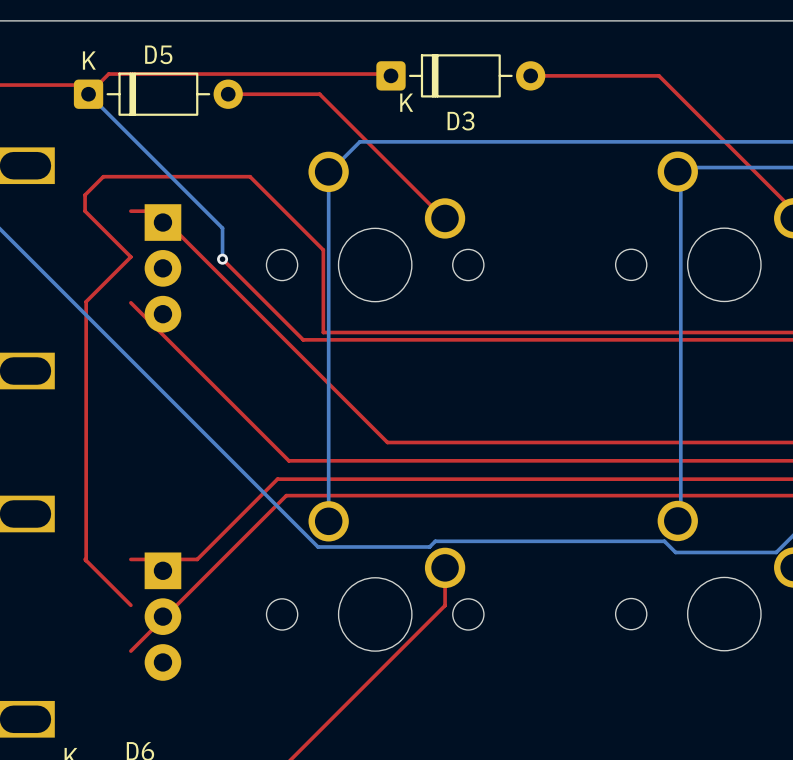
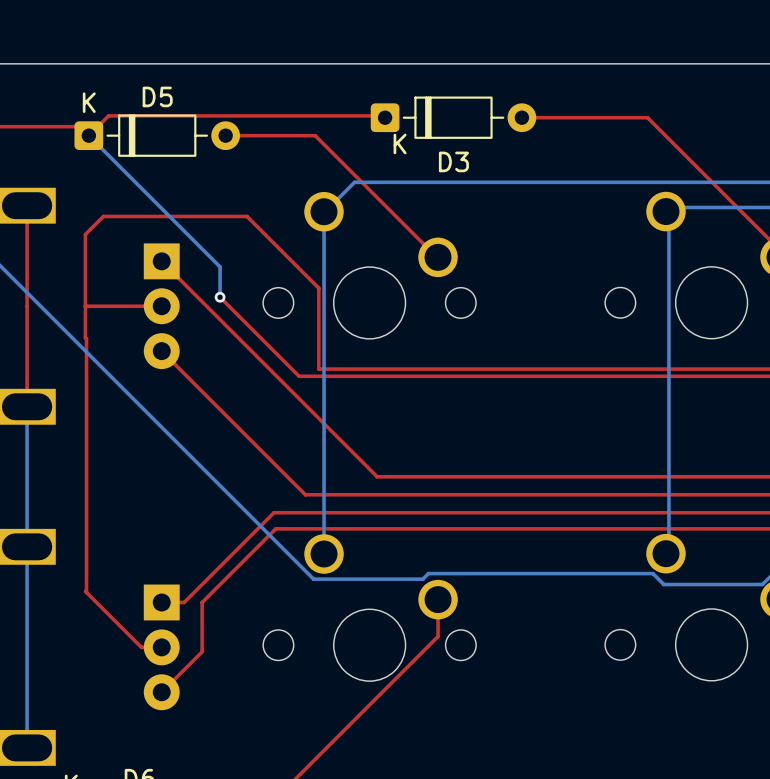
top track: none -> (27, 205) (27, 406)
top track: (85, 211) (130, 256) (86, 301) -> (85, 250) (86, 338)
top track: (130, 211) (156, 211) (387, 442) -> (161, 261) (377, 476) (381, 476)
top track: none -> (161, 306) (85, 306)
top track: (130, 302) (288, 460) (309, 460) -> (161, 351) (305, 494)
bottom track: none -> (27, 406) (27, 747)
top track: (286, 495) (130, 651) -> (282, 528) (275, 528) (202, 602) (202, 651) (161, 692)
top track: (197, 559) (130, 559) -> (195, 591) (184, 602) (161, 602)
top track: none -> (130, 636) (141, 647) (161, 647)

